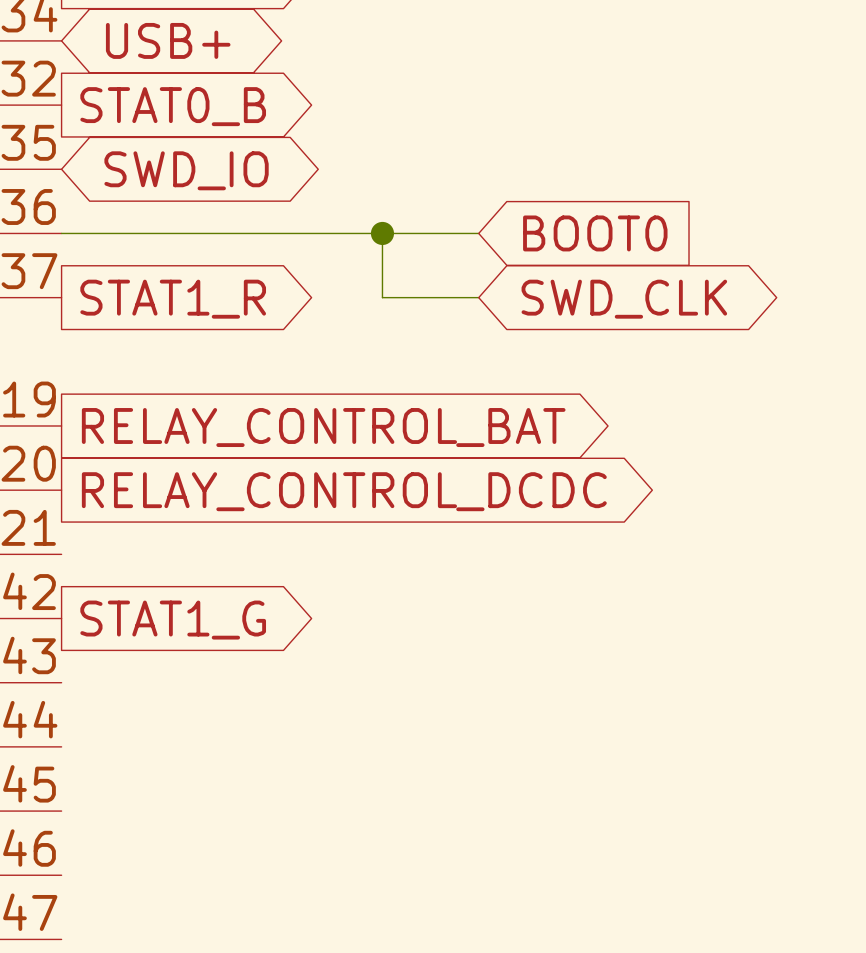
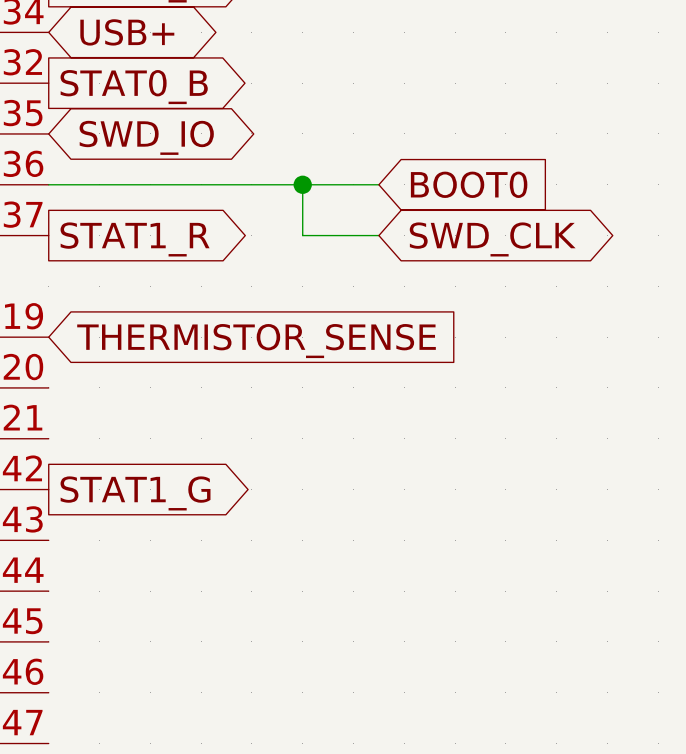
global label shape: output (323, 427) -> input (256, 341)
global label: RELAY_CONTROL_BAT (323, 427) -> THERMISTOR_SENSE (256, 341)
global label: RELAY_CONTROL_DCDC (344, 491) -> none

